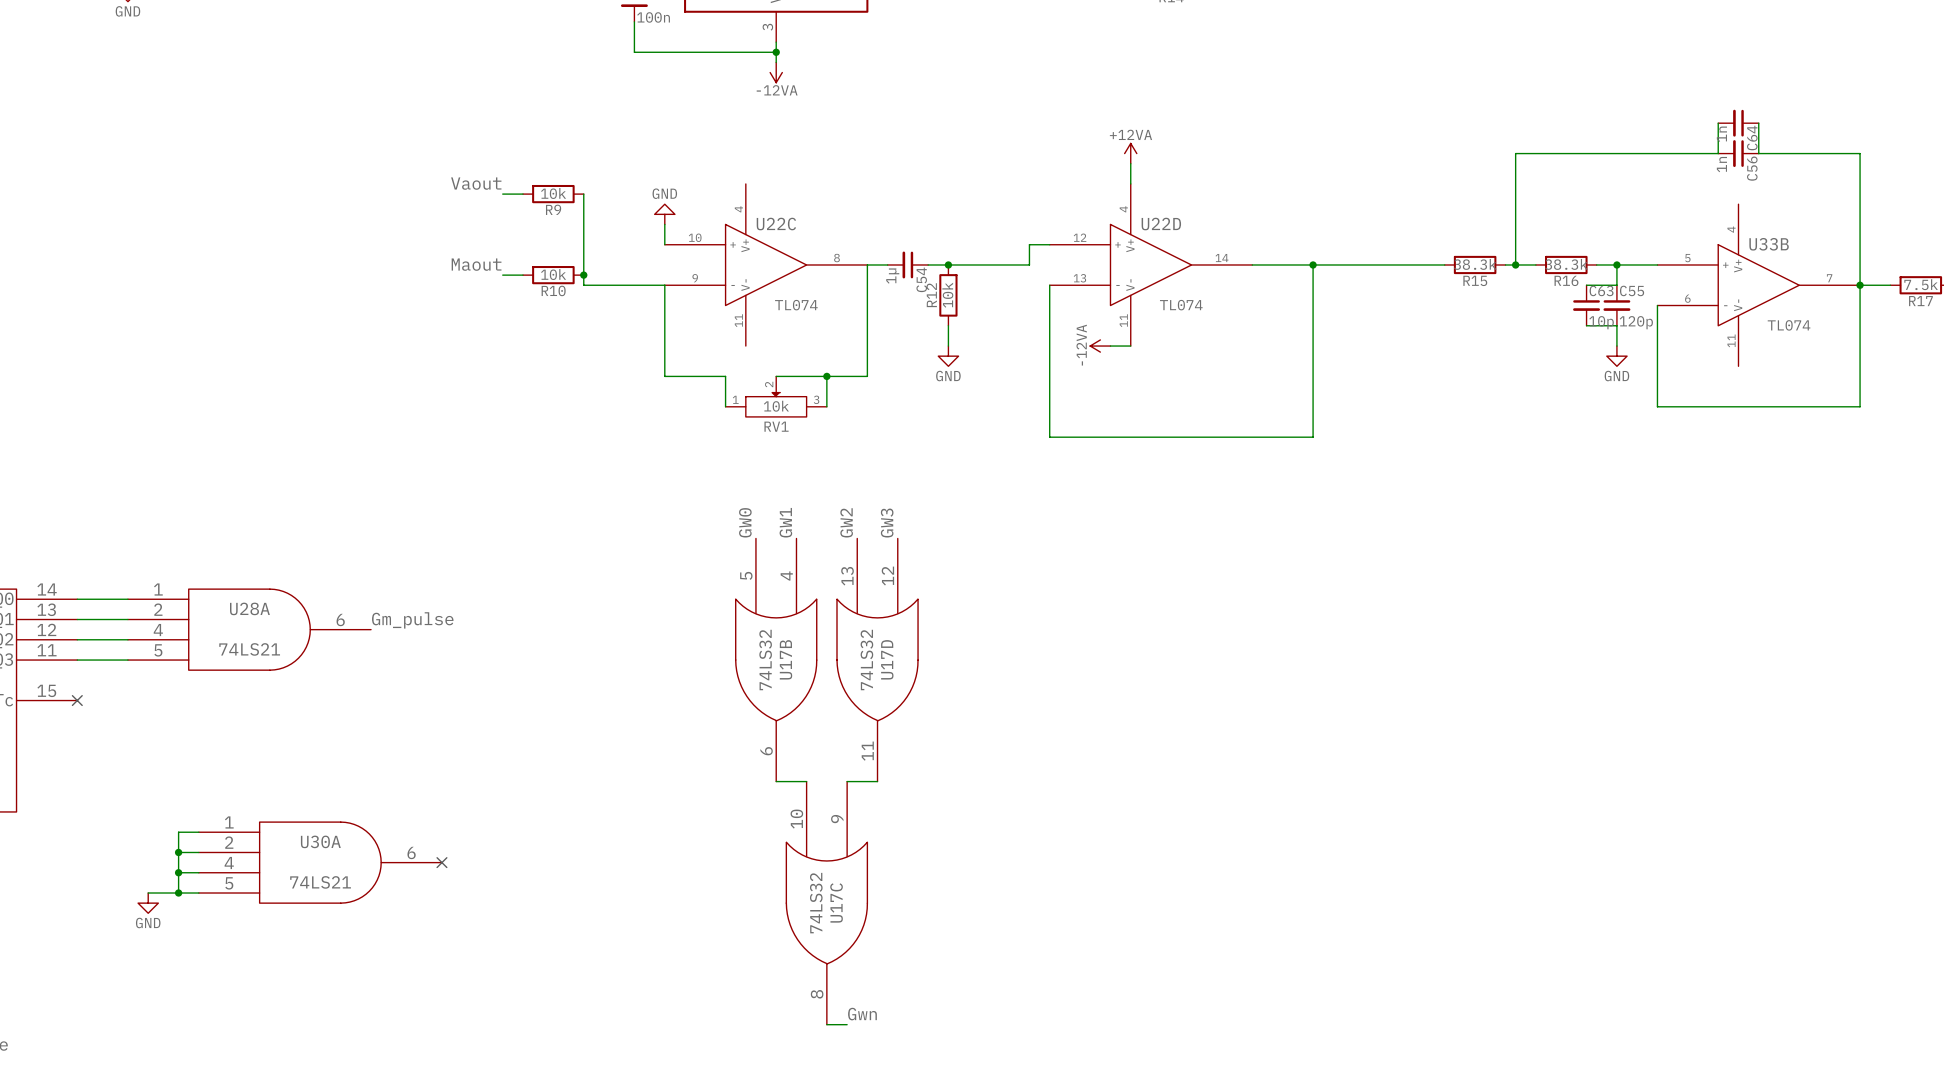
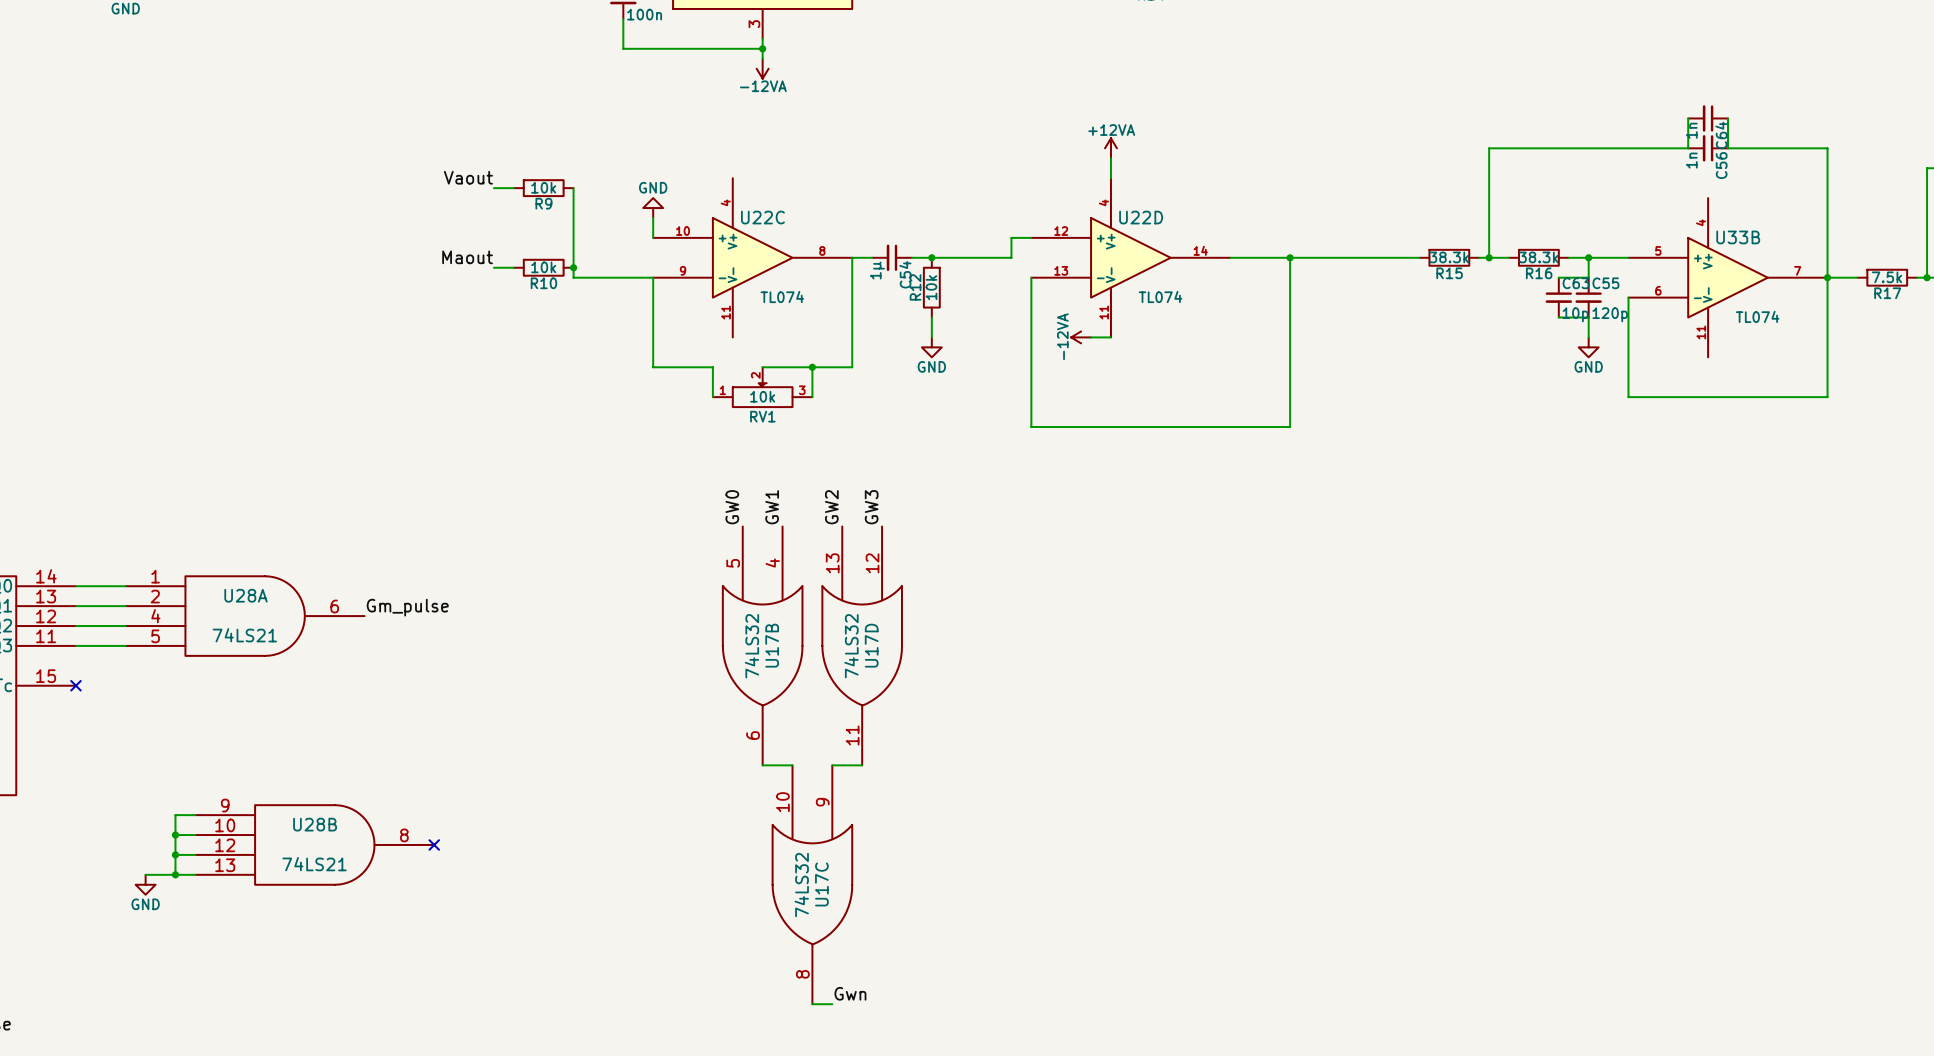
U30A pin number: 1 (229, 822) -> 9 (225, 805)
U30A name: U30A (320, 841) -> U28B (315, 824)
U30A pin number: 2 (229, 842) -> 10 (225, 825)
U30A pin number: 6 (411, 852) -> 8 (404, 835)
U30A pin number: 4 (229, 863) -> 12 (225, 845)
U30A pin number: 5 (229, 883) -> 13 (225, 865)

